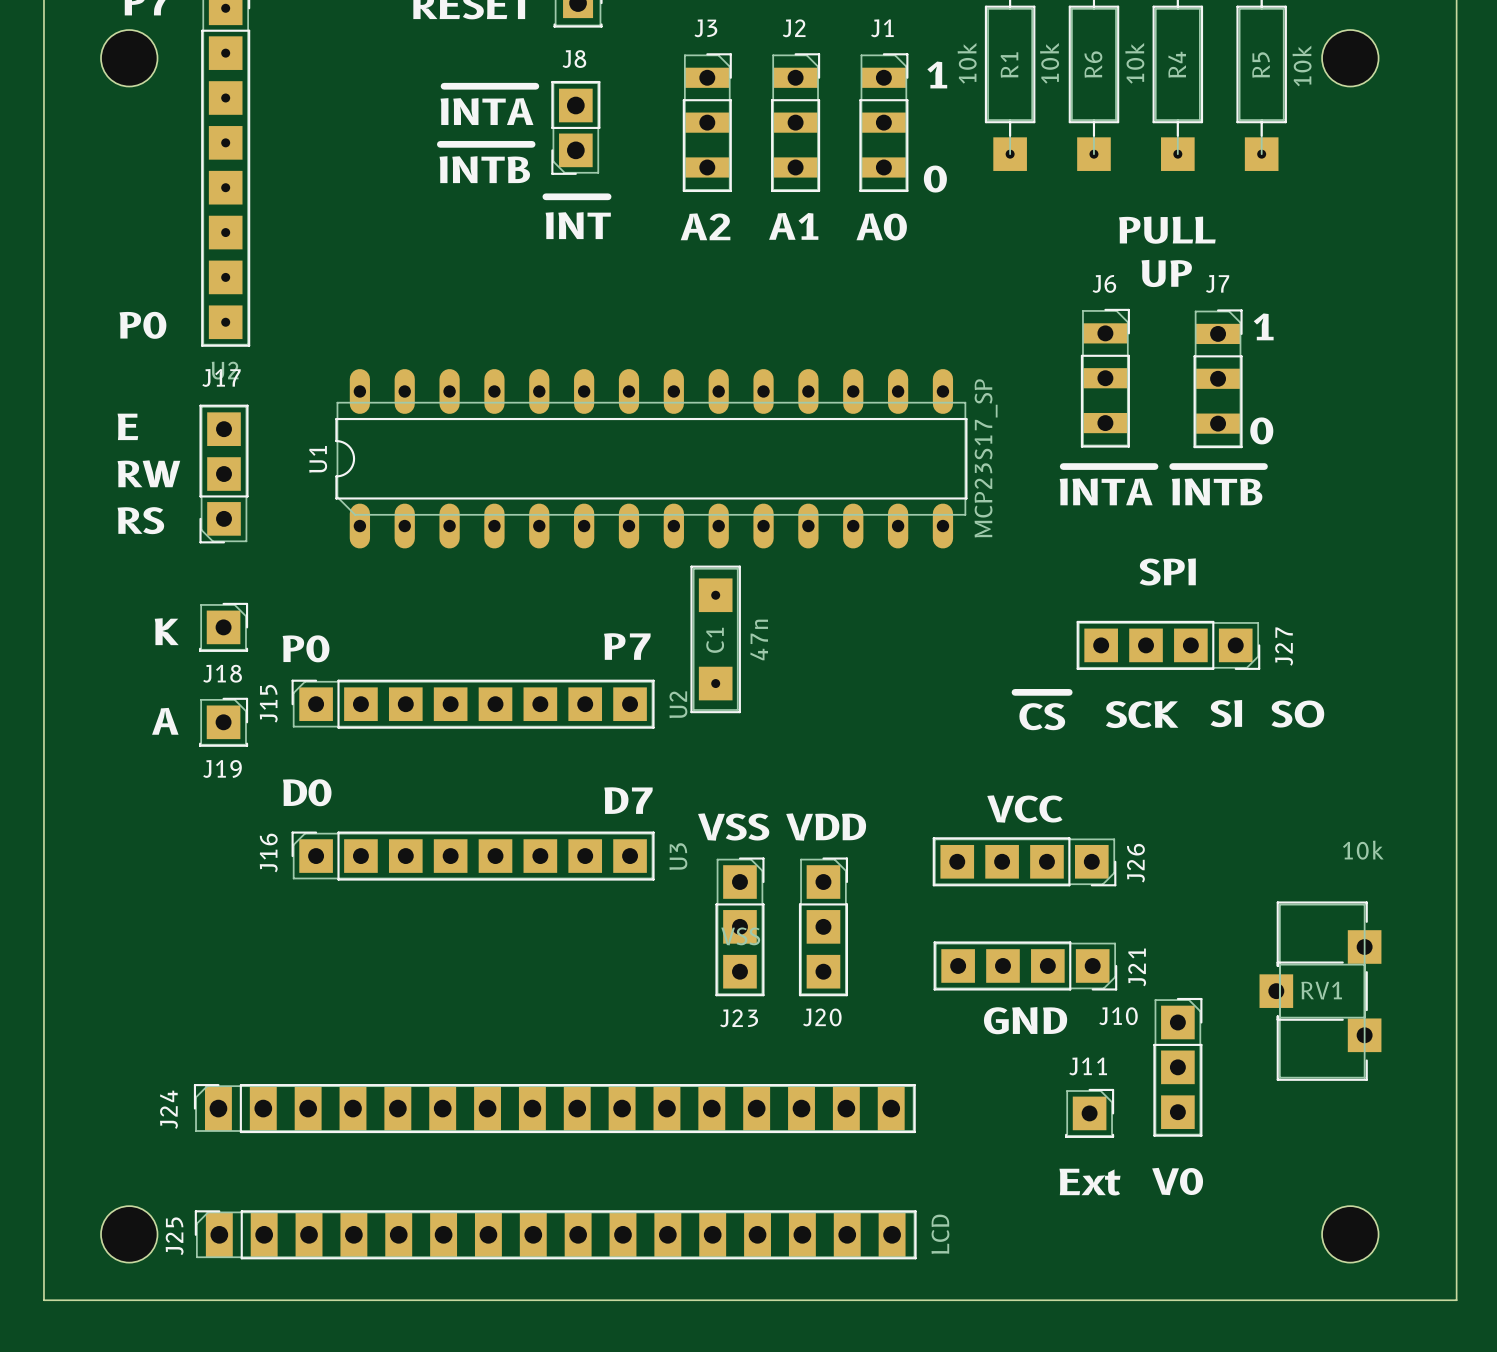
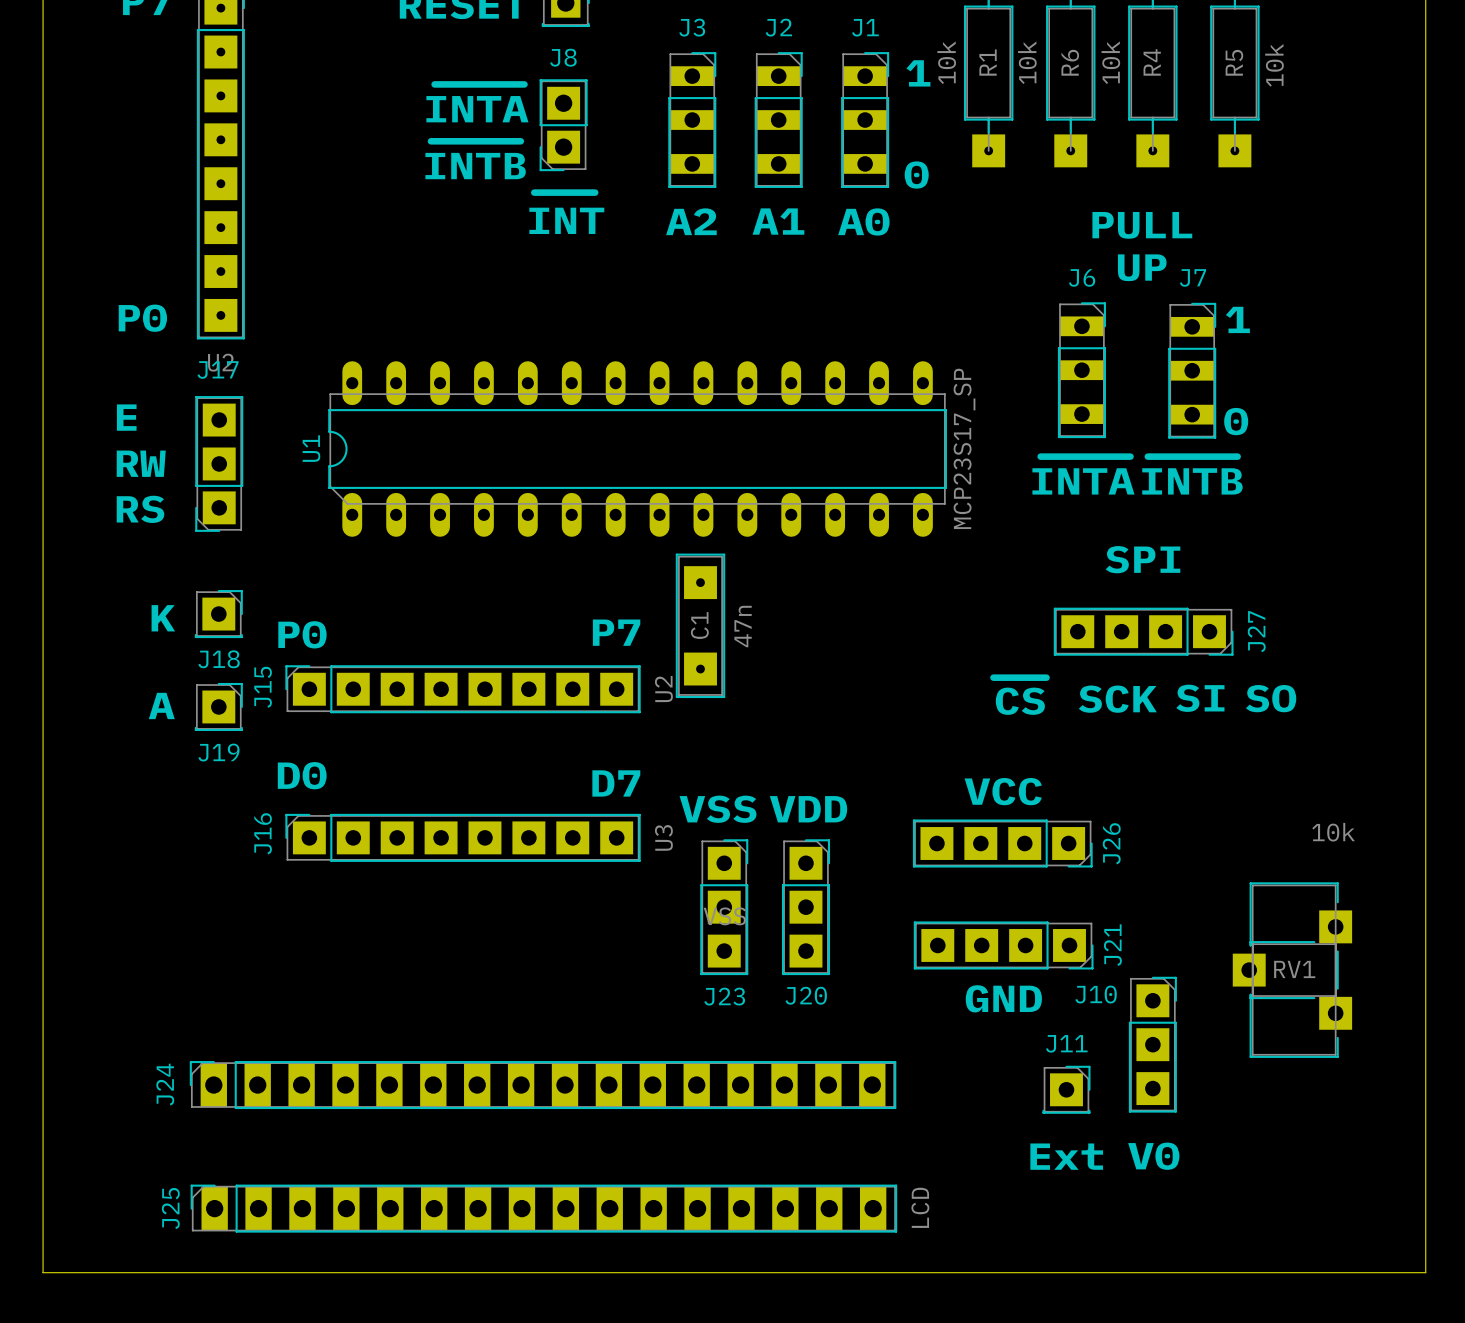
part: (129, 58) -> none
part: (1350, 58) -> none
part: (129, 1234) -> none
part: (1350, 1234) -> none

